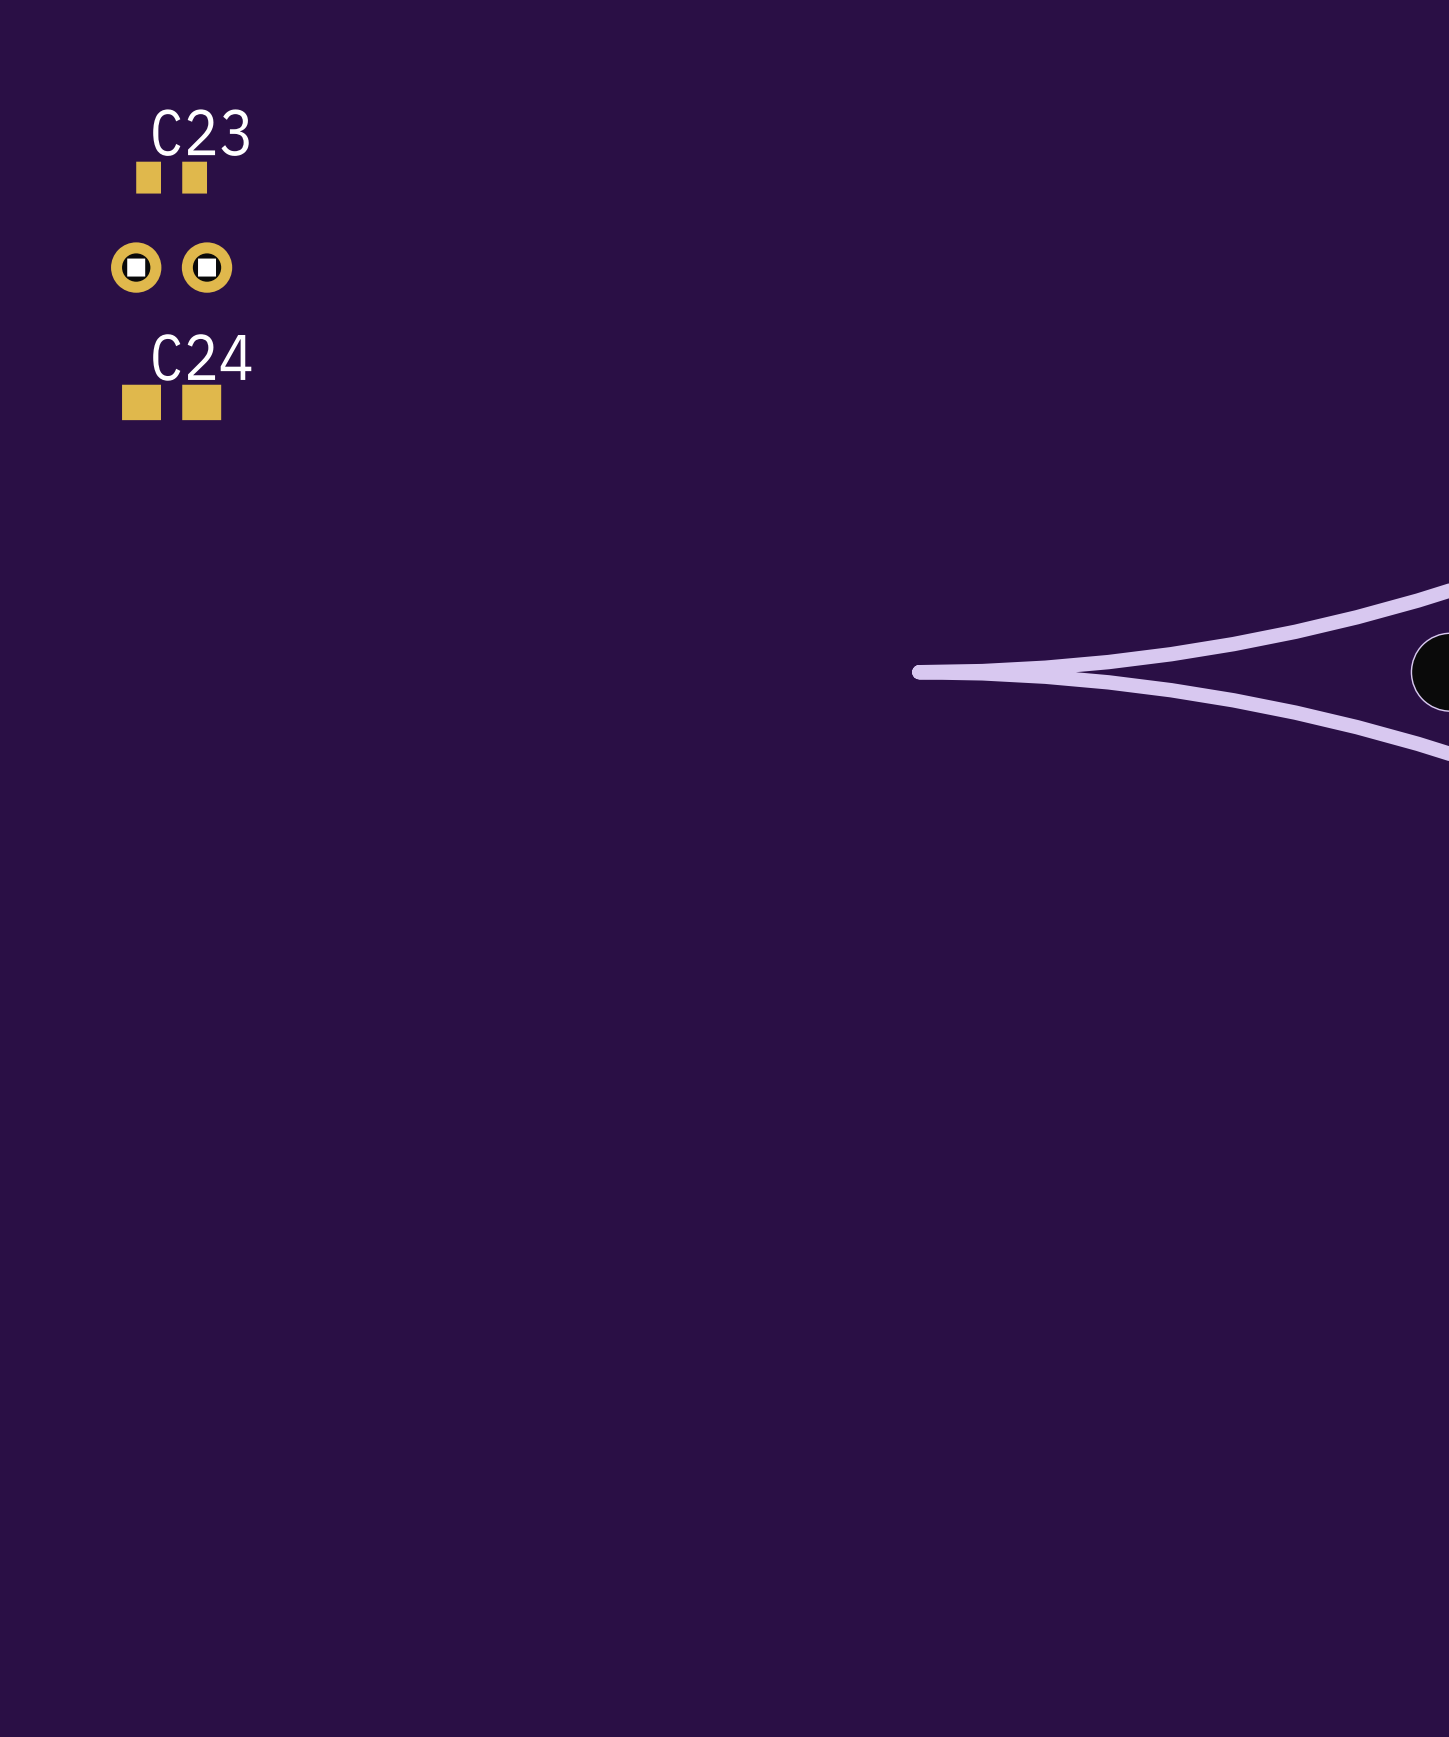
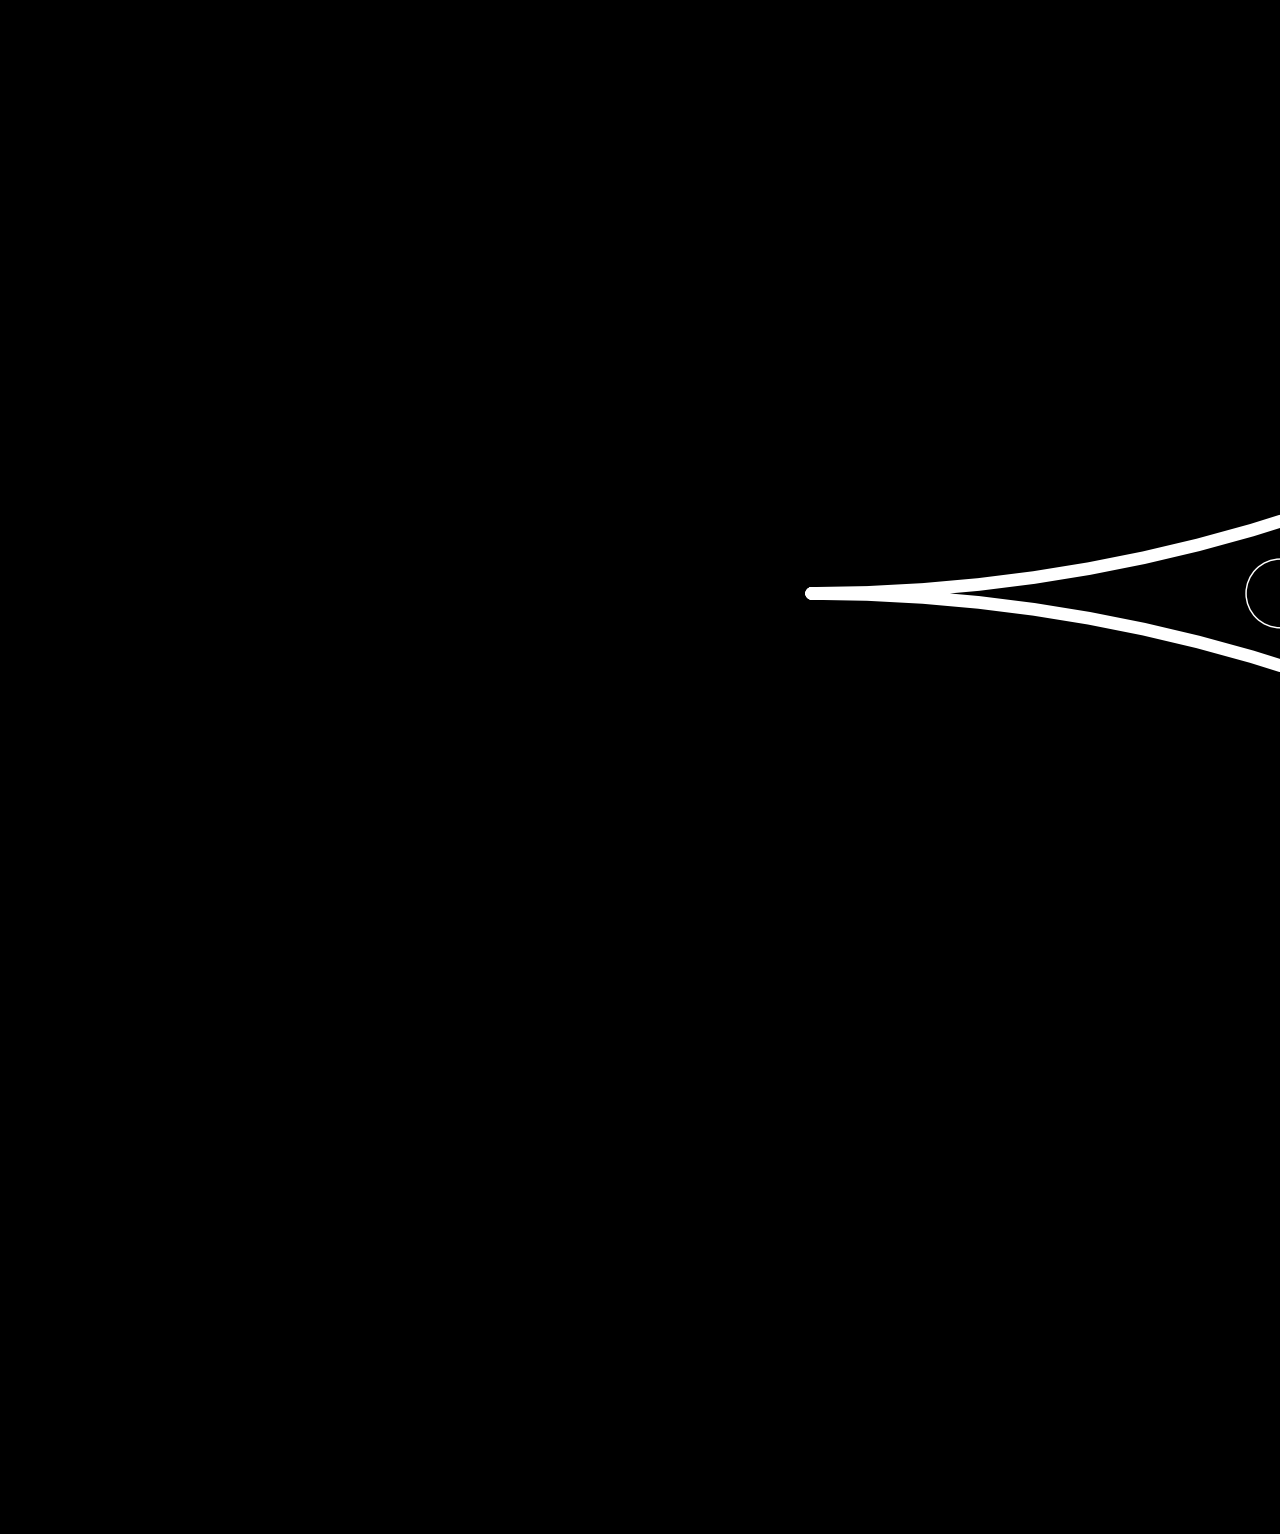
C23: (171, 177) -> none
part: (171, 267) -> none
C24: (171, 402) -> none

